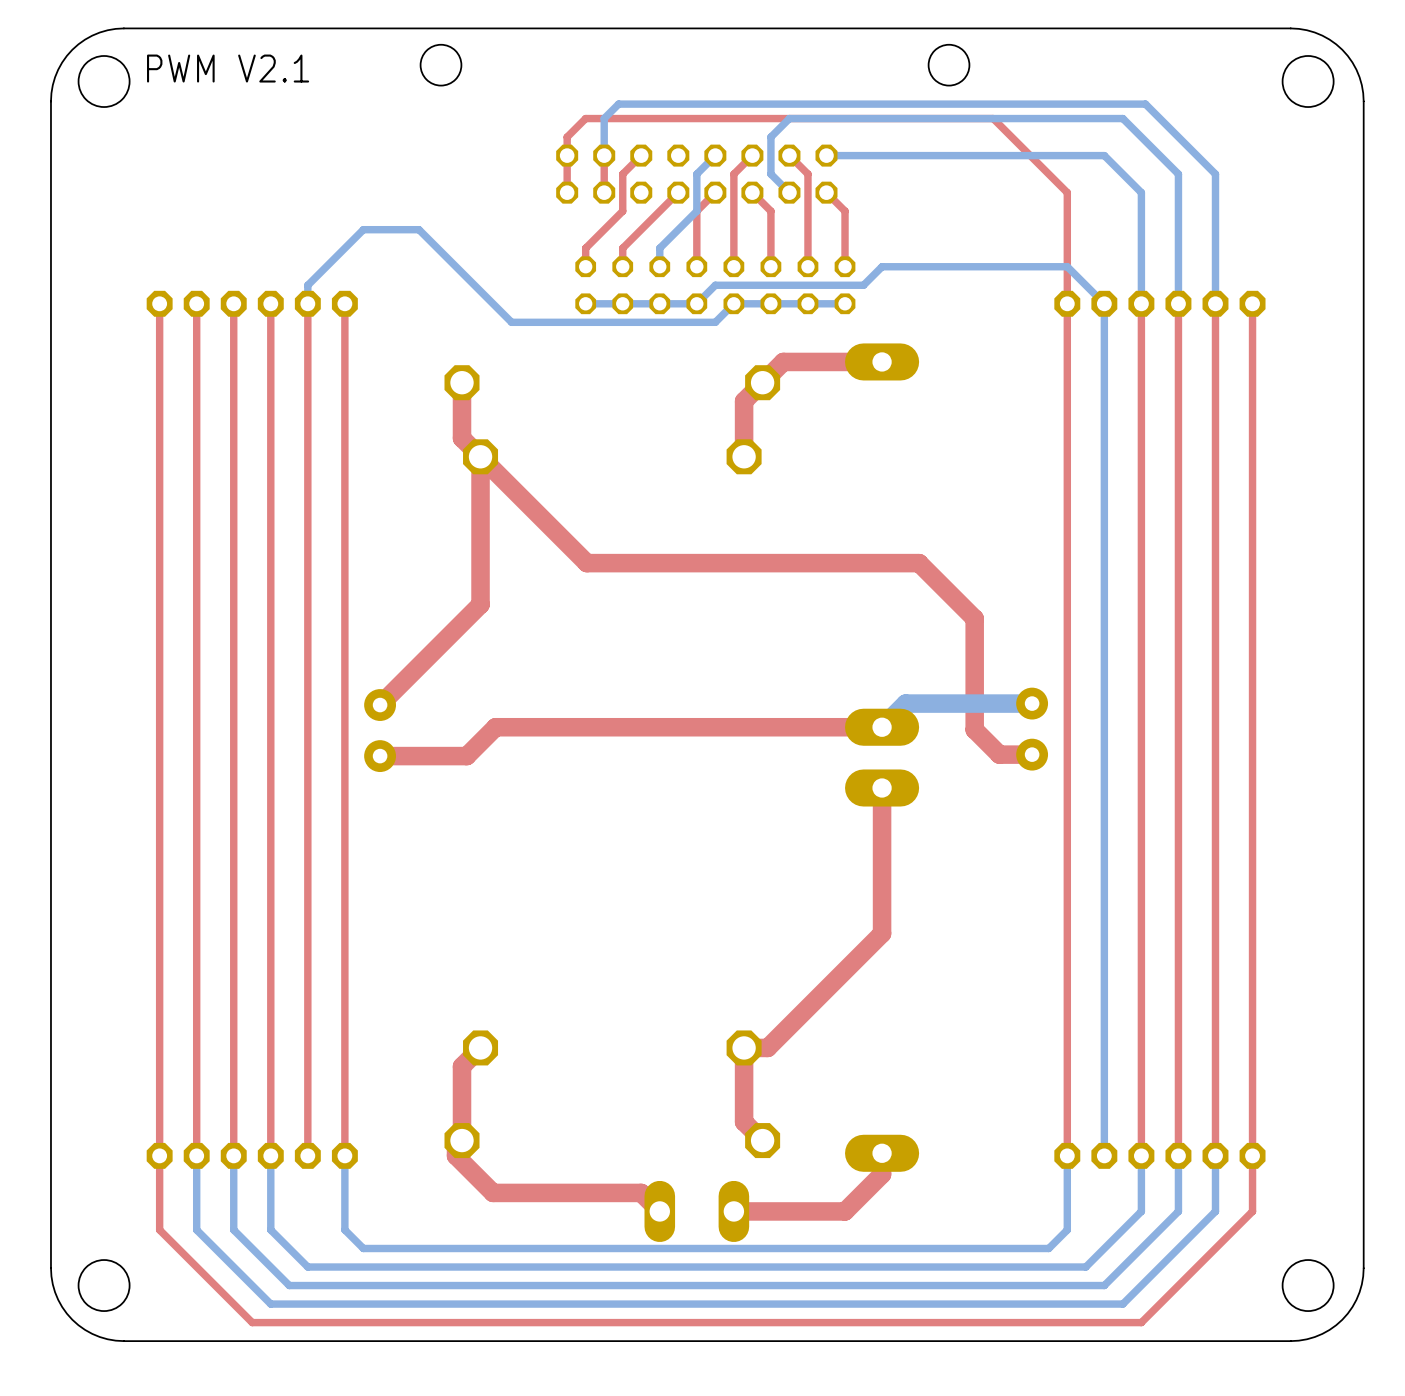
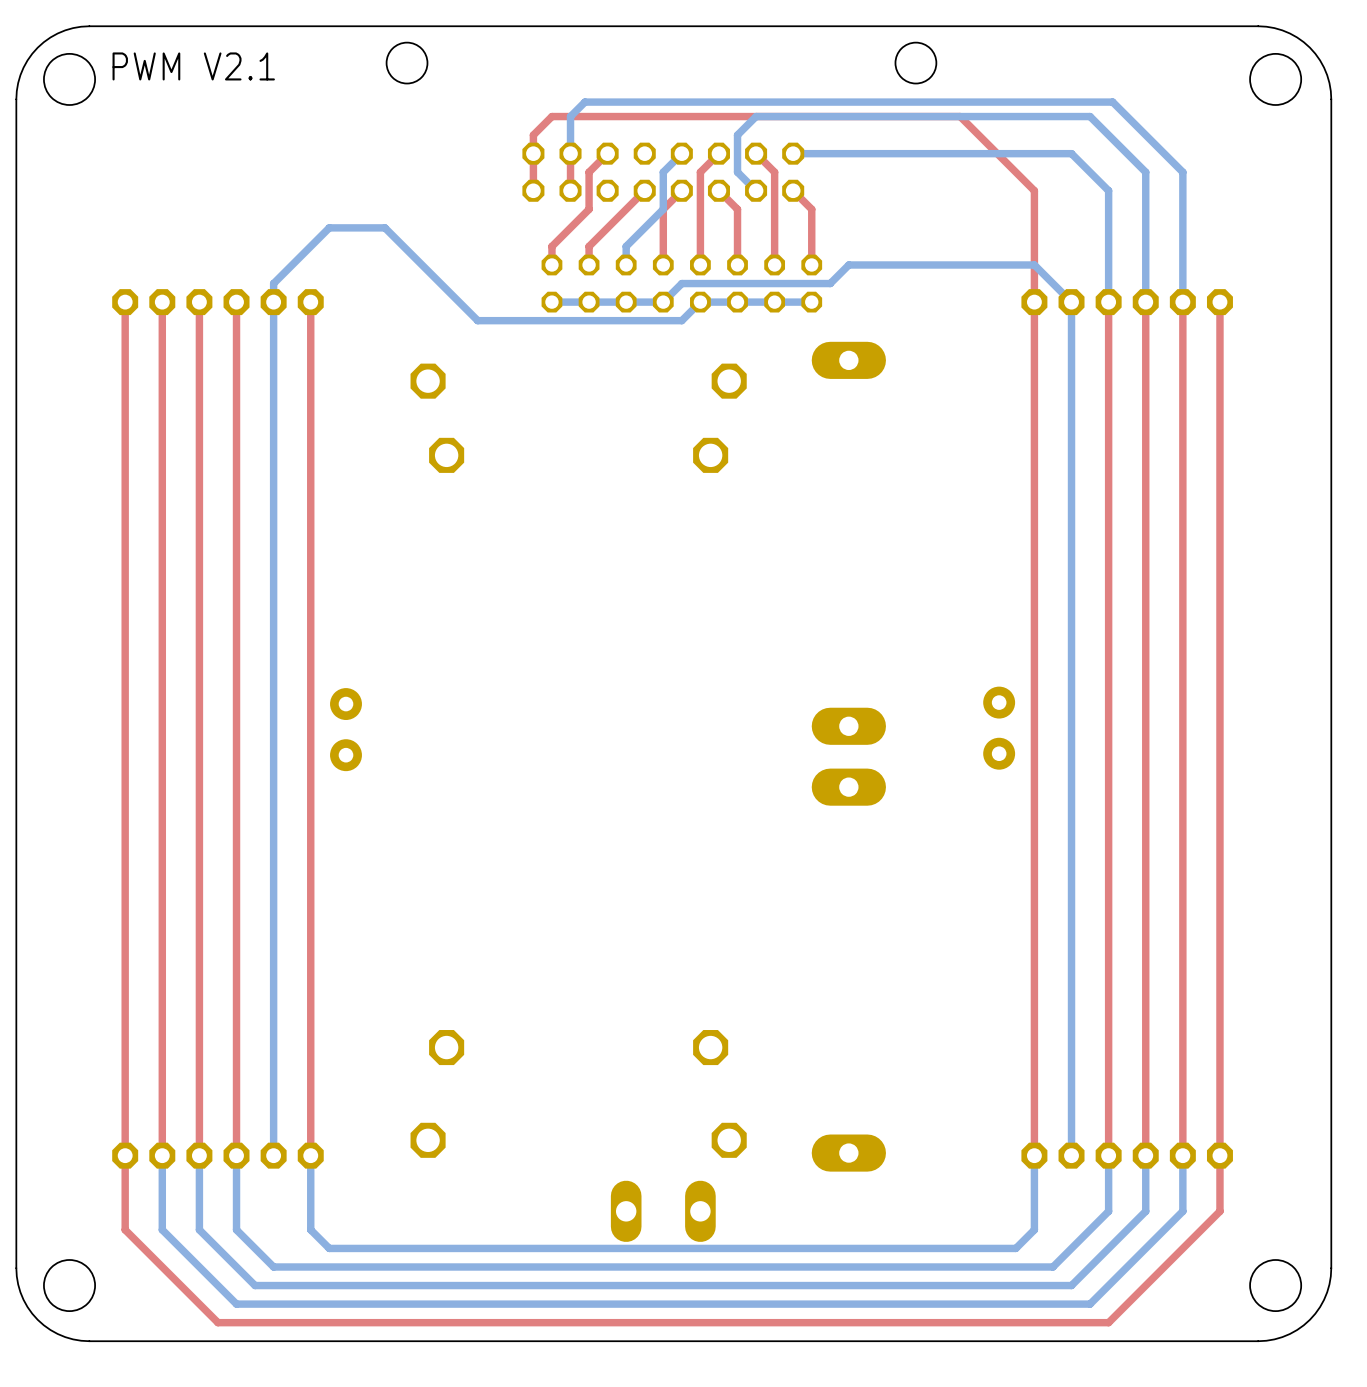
top track: (307, 303) (307, 1155) -> none
bottom track: none -> (273, 302) (273, 1155)
top track: (882, 361) (783, 361) (744, 401) (744, 456) -> none
top track: (462, 382) (462, 438) (586, 563) (919, 563) (974, 618) (974, 729) (999, 754) (1032, 754) -> none
top track: (480, 456) (480, 604) (380, 705) -> none
bottom track: (1032, 703) (905, 703) (882, 727) -> none
top track: (882, 727) (495, 727) (466, 756) (380, 756) -> none
top track: (882, 788) (882, 933) (767, 1047) (744, 1047) (744, 1122) (762, 1140) -> none
top track: (480, 1047) (462, 1066) (462, 1140) (456, 1146) (456, 1155) (493, 1192) (641, 1192) (659, 1211) -> none
top track: (882, 1153) (882, 1174) (845, 1211) (733, 1211) -> none

